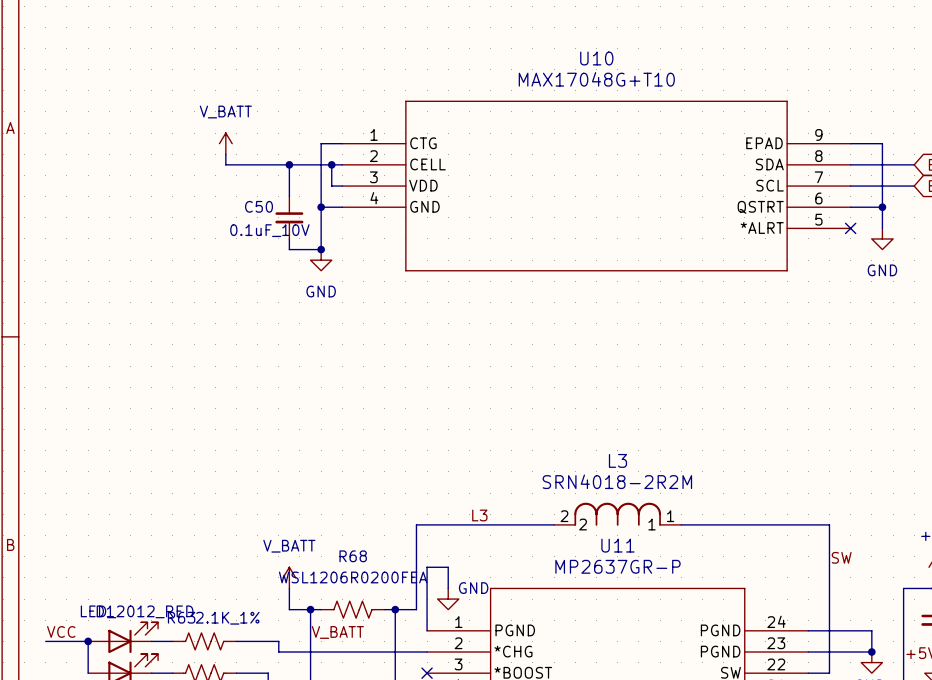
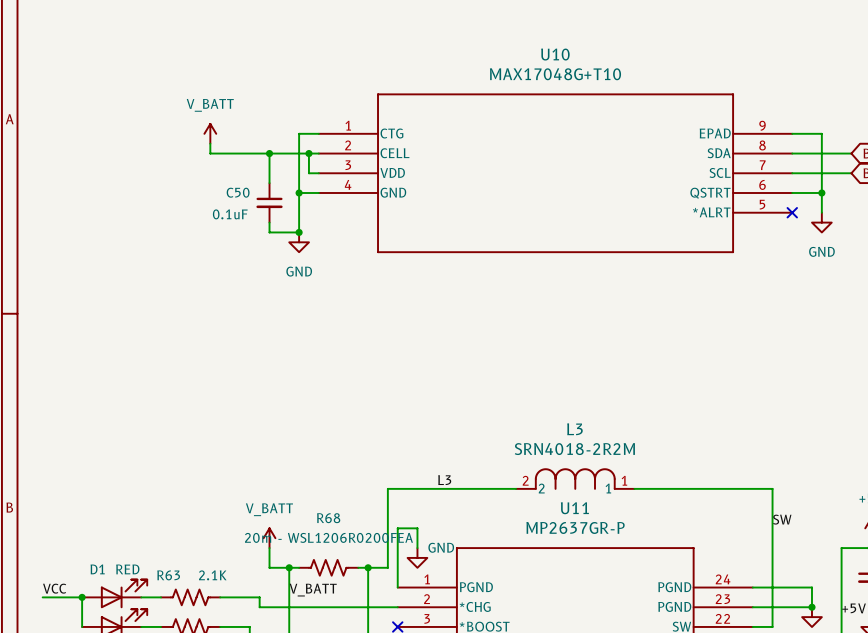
C50 value: 0.1uF_10V (269, 230) -> 0.1uF (230, 214)
R68 value: WSL1206R0200FEA (353, 577) -> 20m - WSL1206R0200FEA (328, 537)
D1 value: LED_2012_RED (137, 611) -> RED (127, 569)
R63 value: 2.1K_1% (227, 618) -> 2.1K (212, 575)

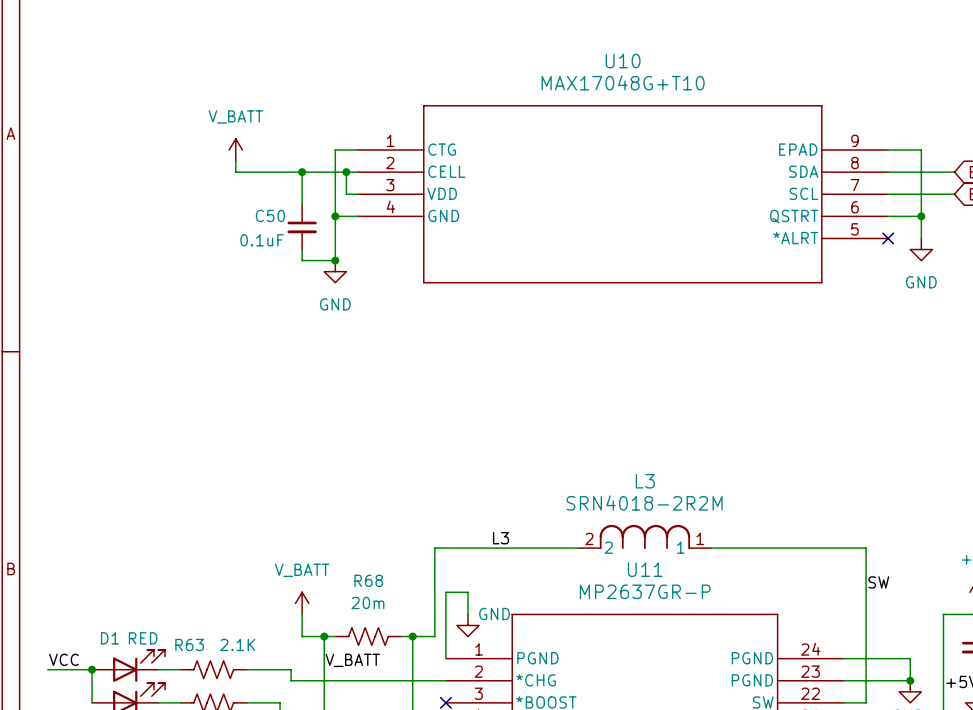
R68 value: 20m - WSL1206R0200FEA (328, 537) -> 20m (367, 602)

